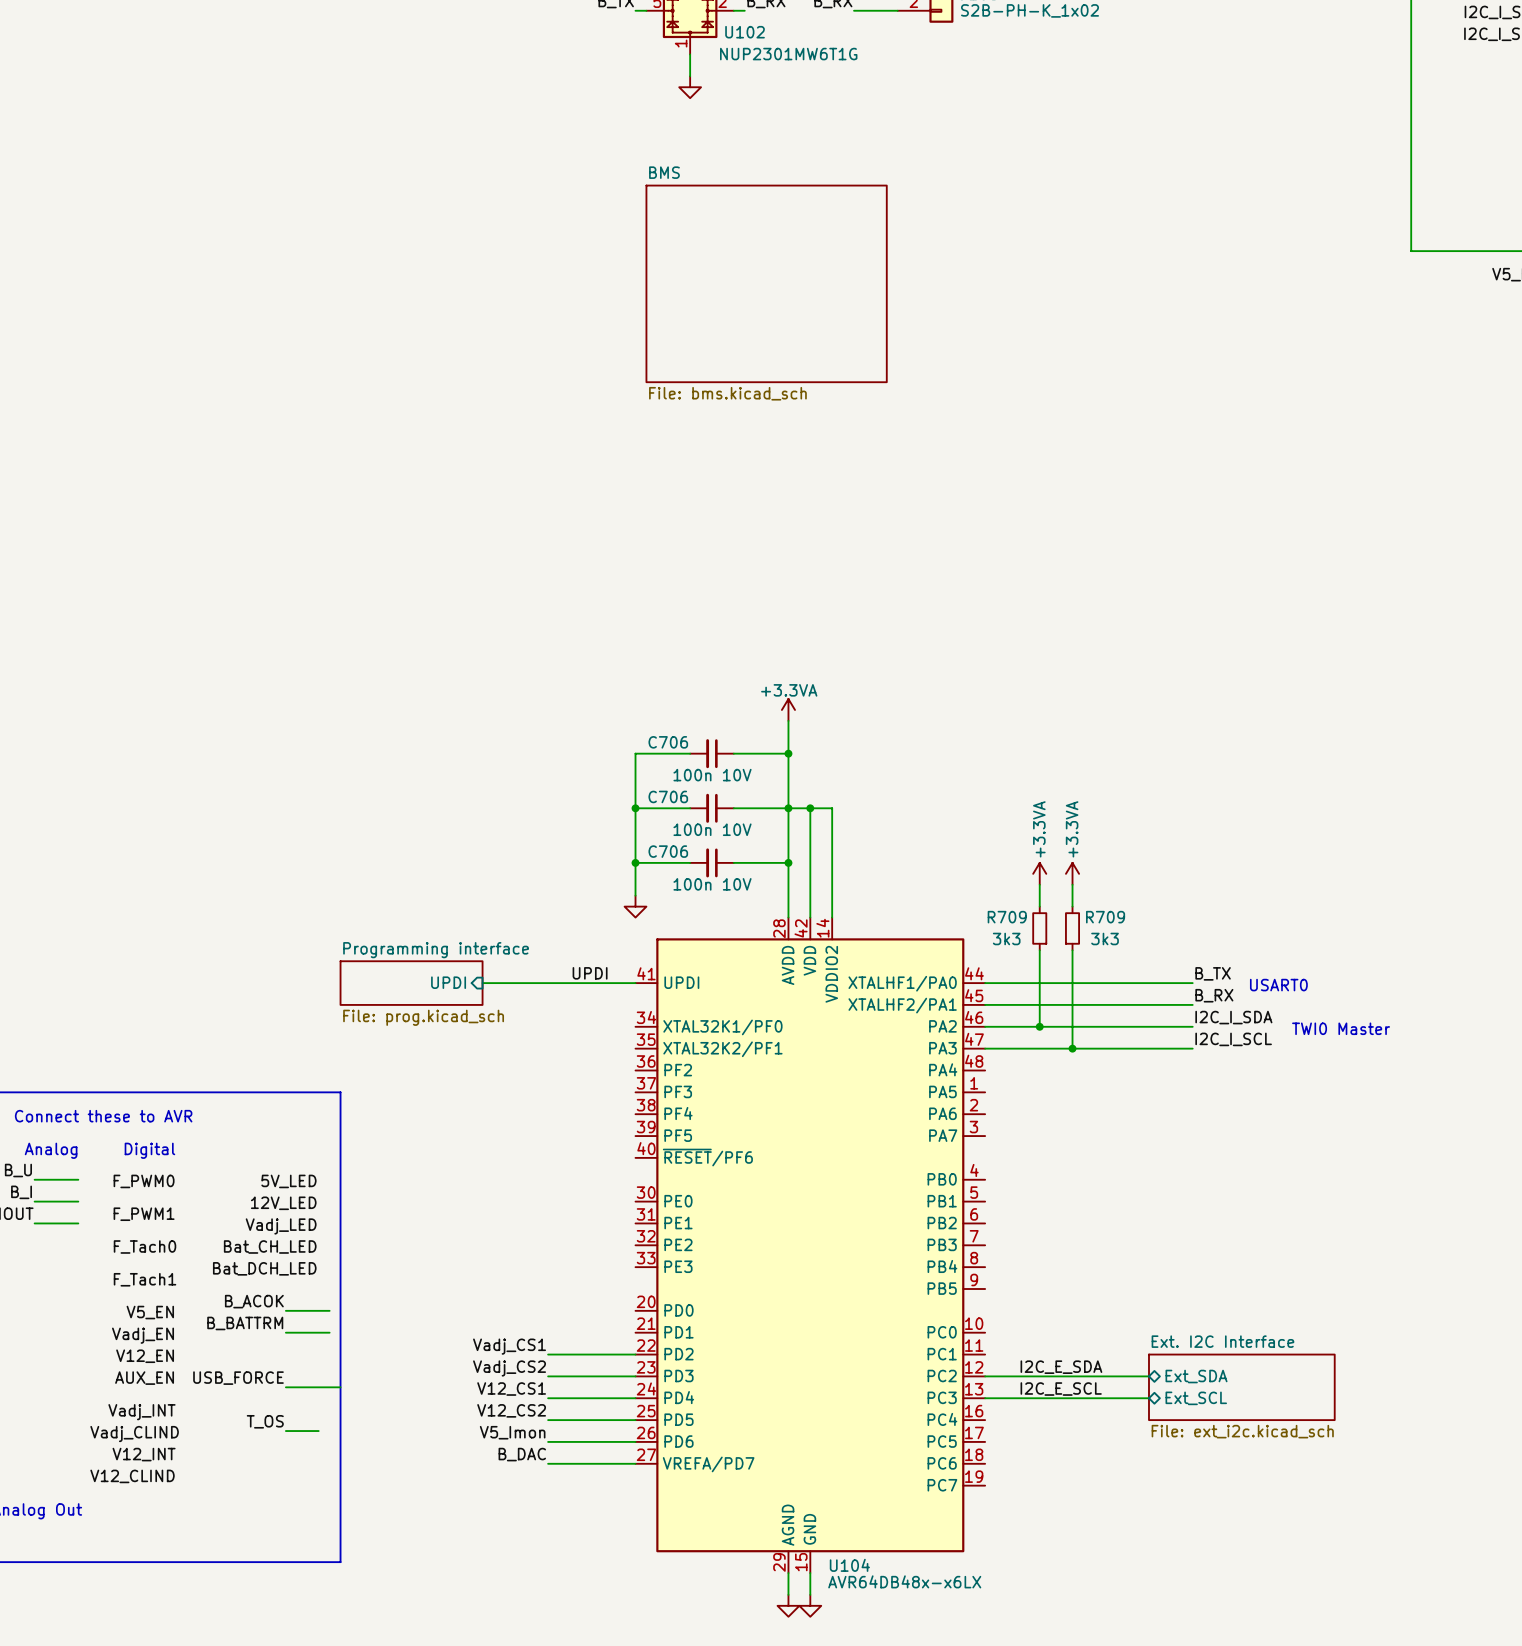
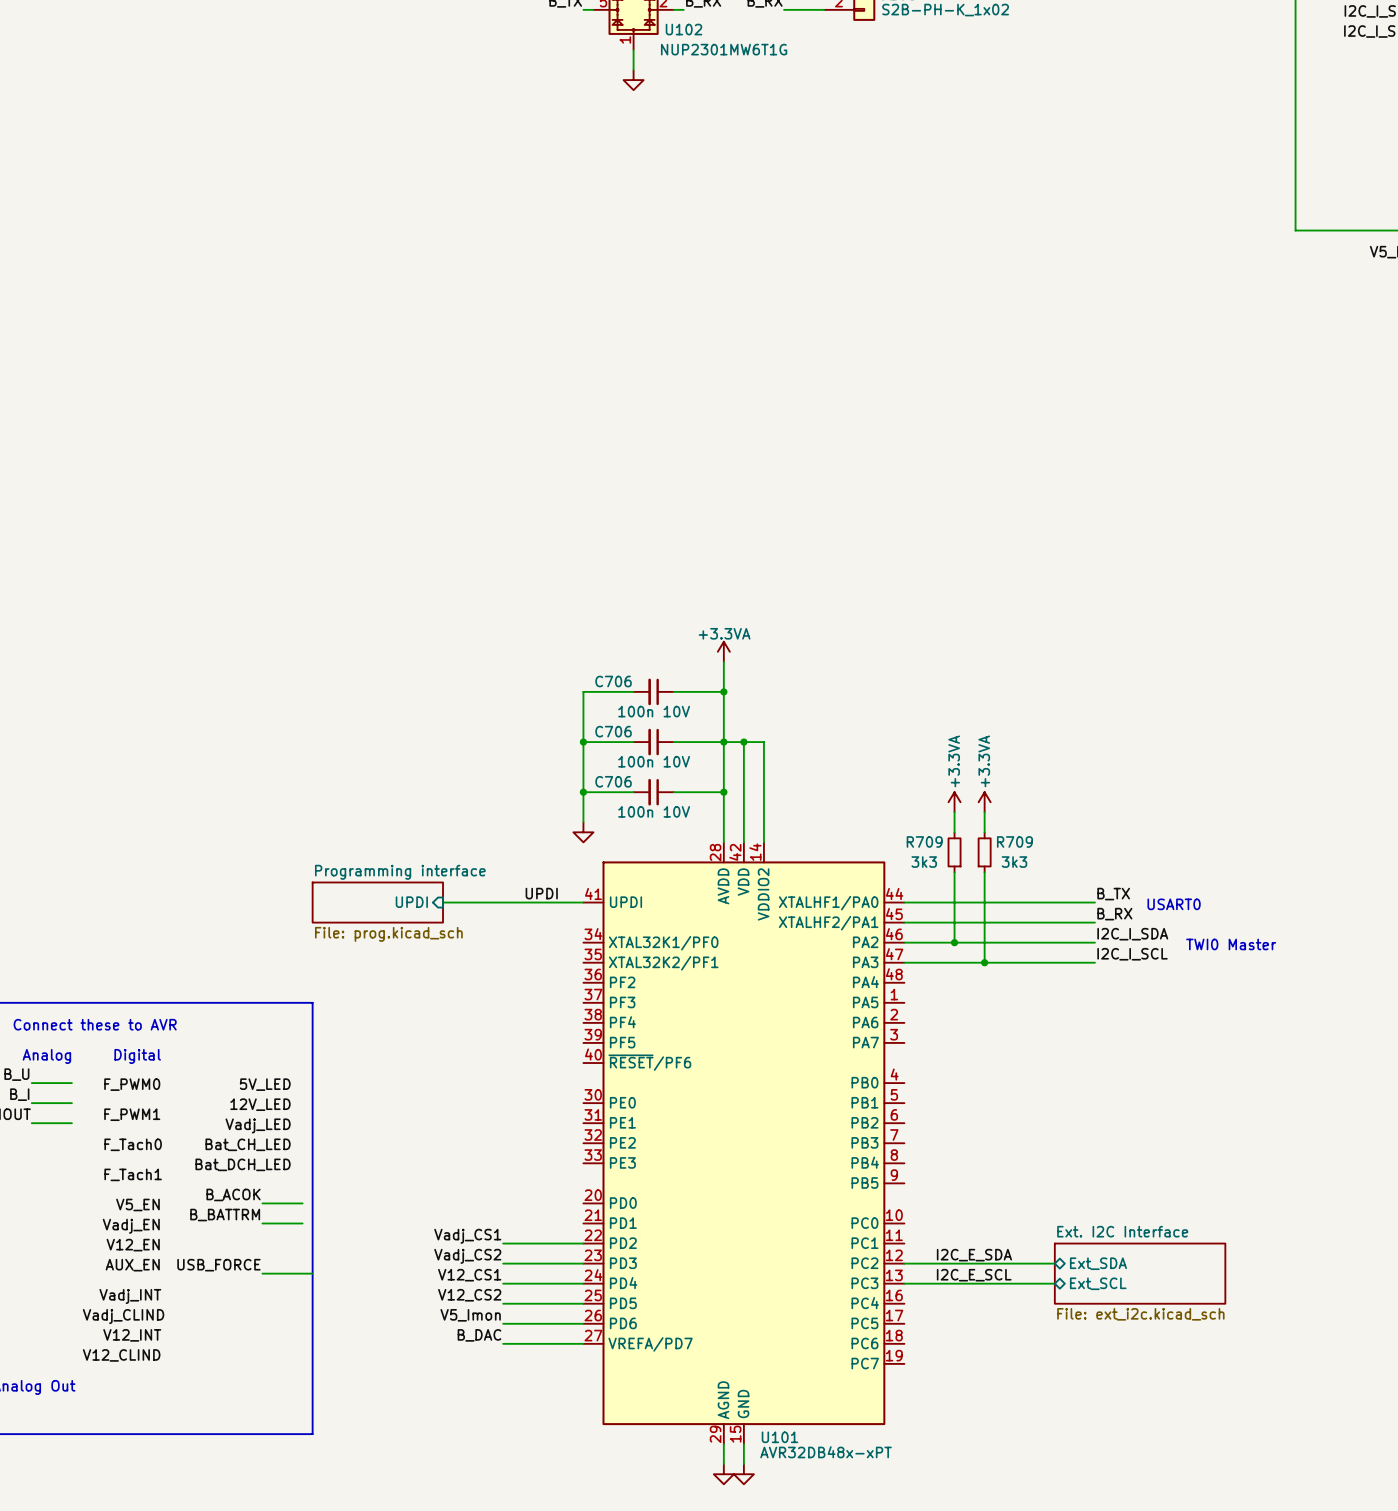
sheet BMS: File: bms.kicad_sch (766, 283) -> none
label: T_OS (265, 1421) -> none
wire: (285, 1431) (318, 1431) -> none
U104 name: U104 (849, 1565) -> U101 (779, 1437)
U104 value: AVR64DB48x-x6LX (904, 1581) -> AVR32DB48x-xPT (826, 1452)

